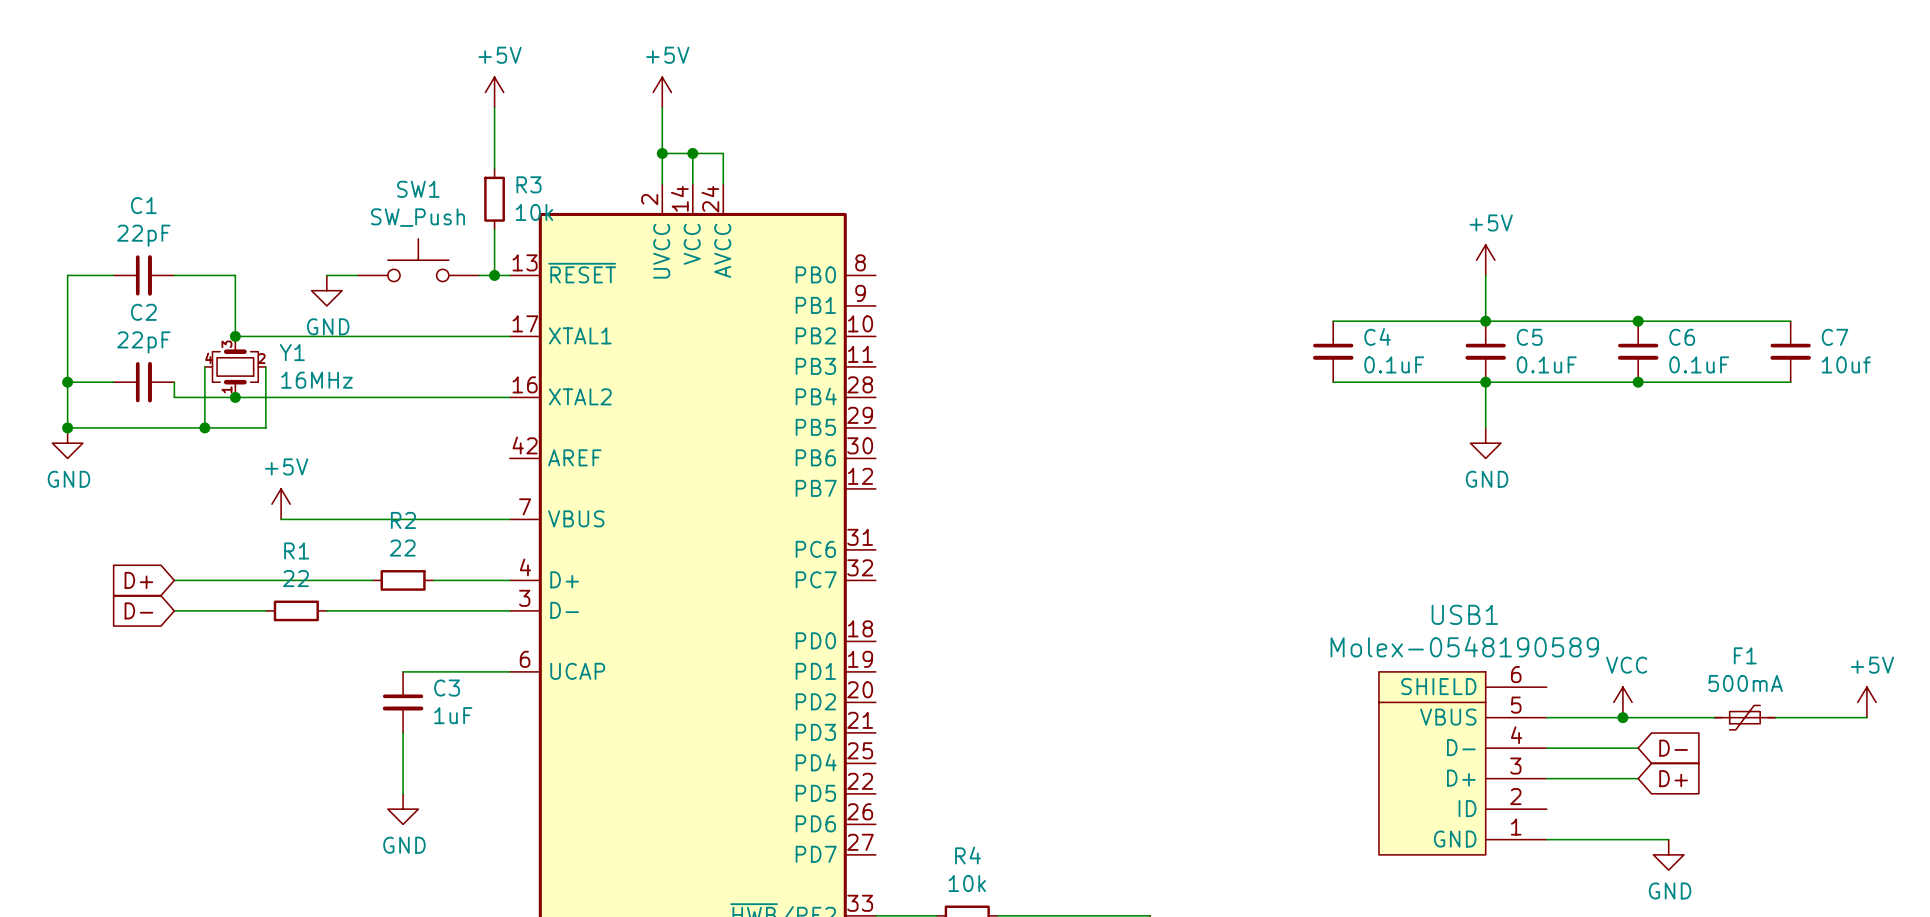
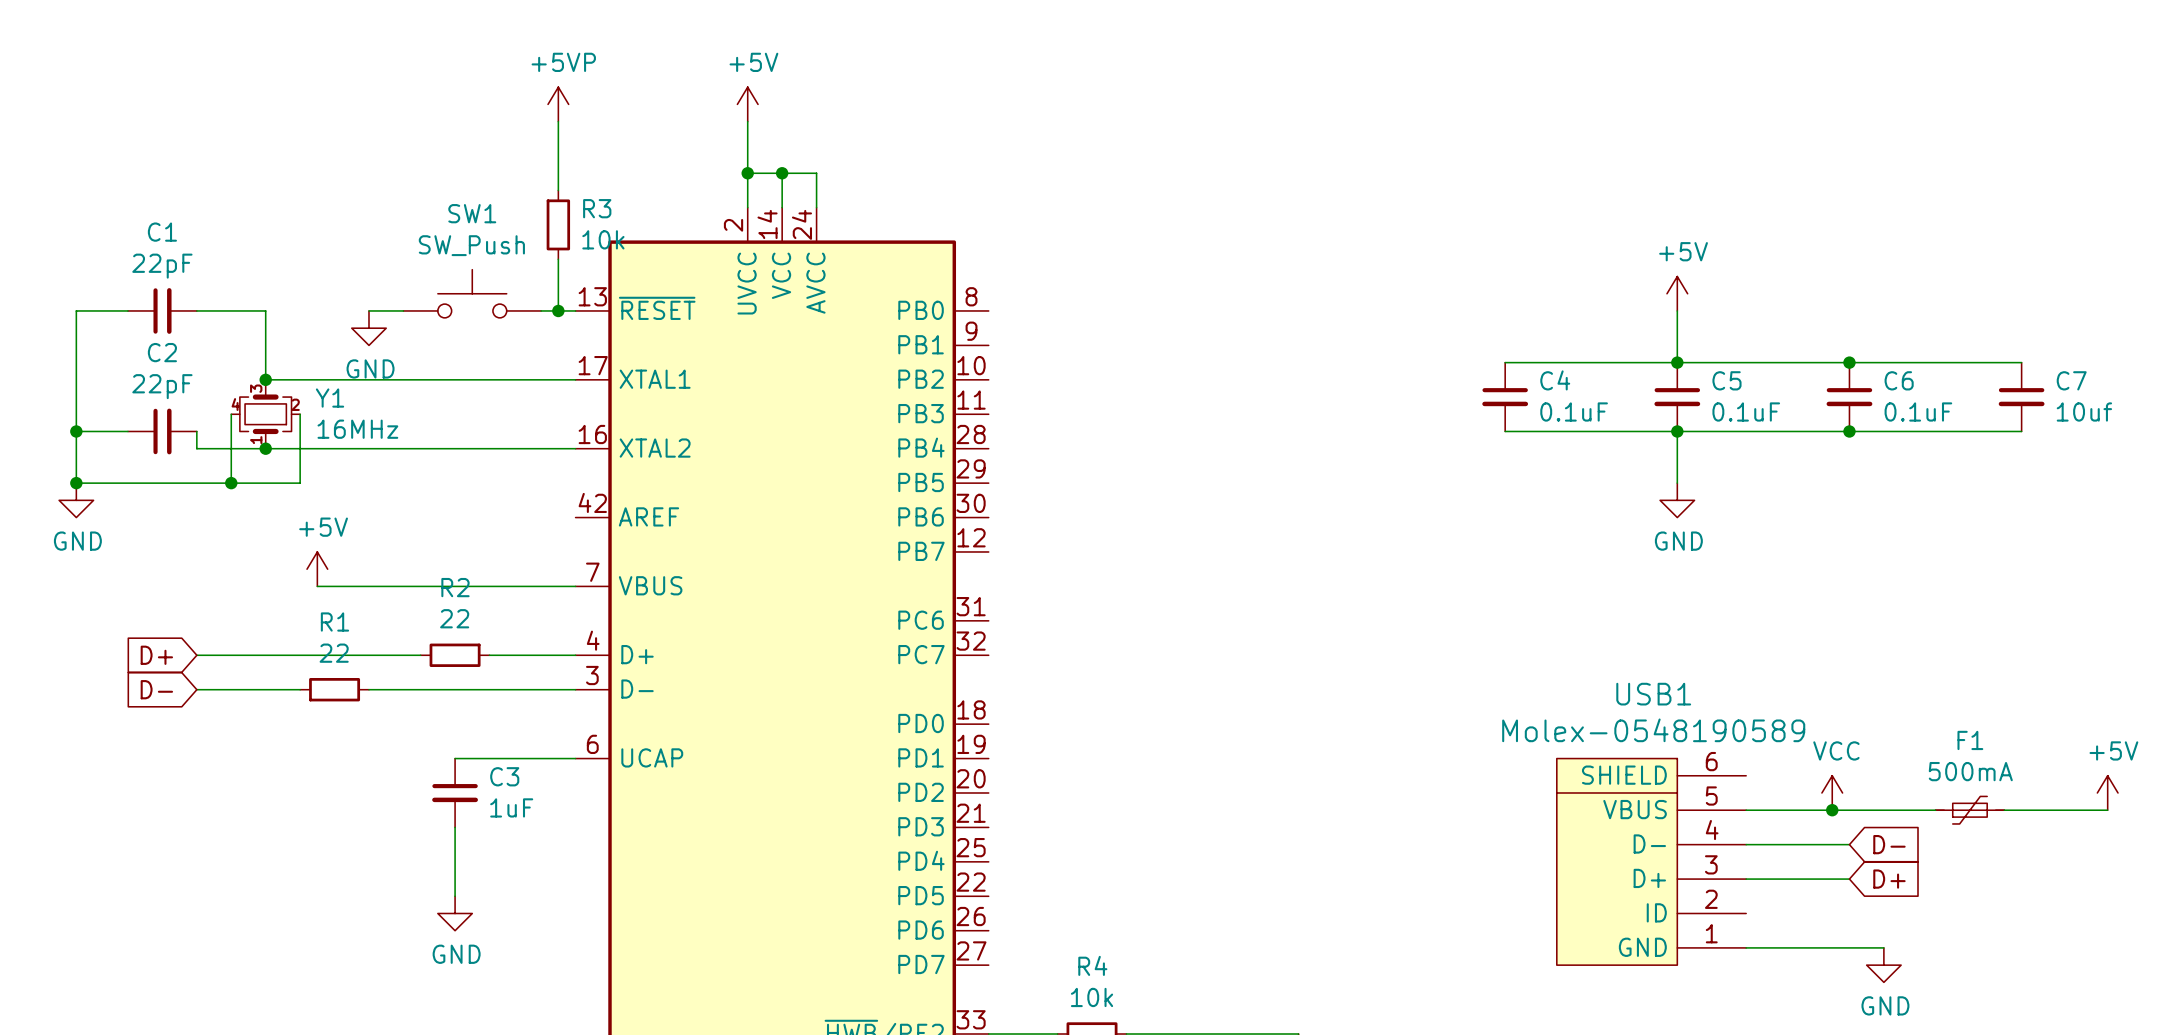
power symbol: +5V (494, 92) -> +5VP (558, 104)

